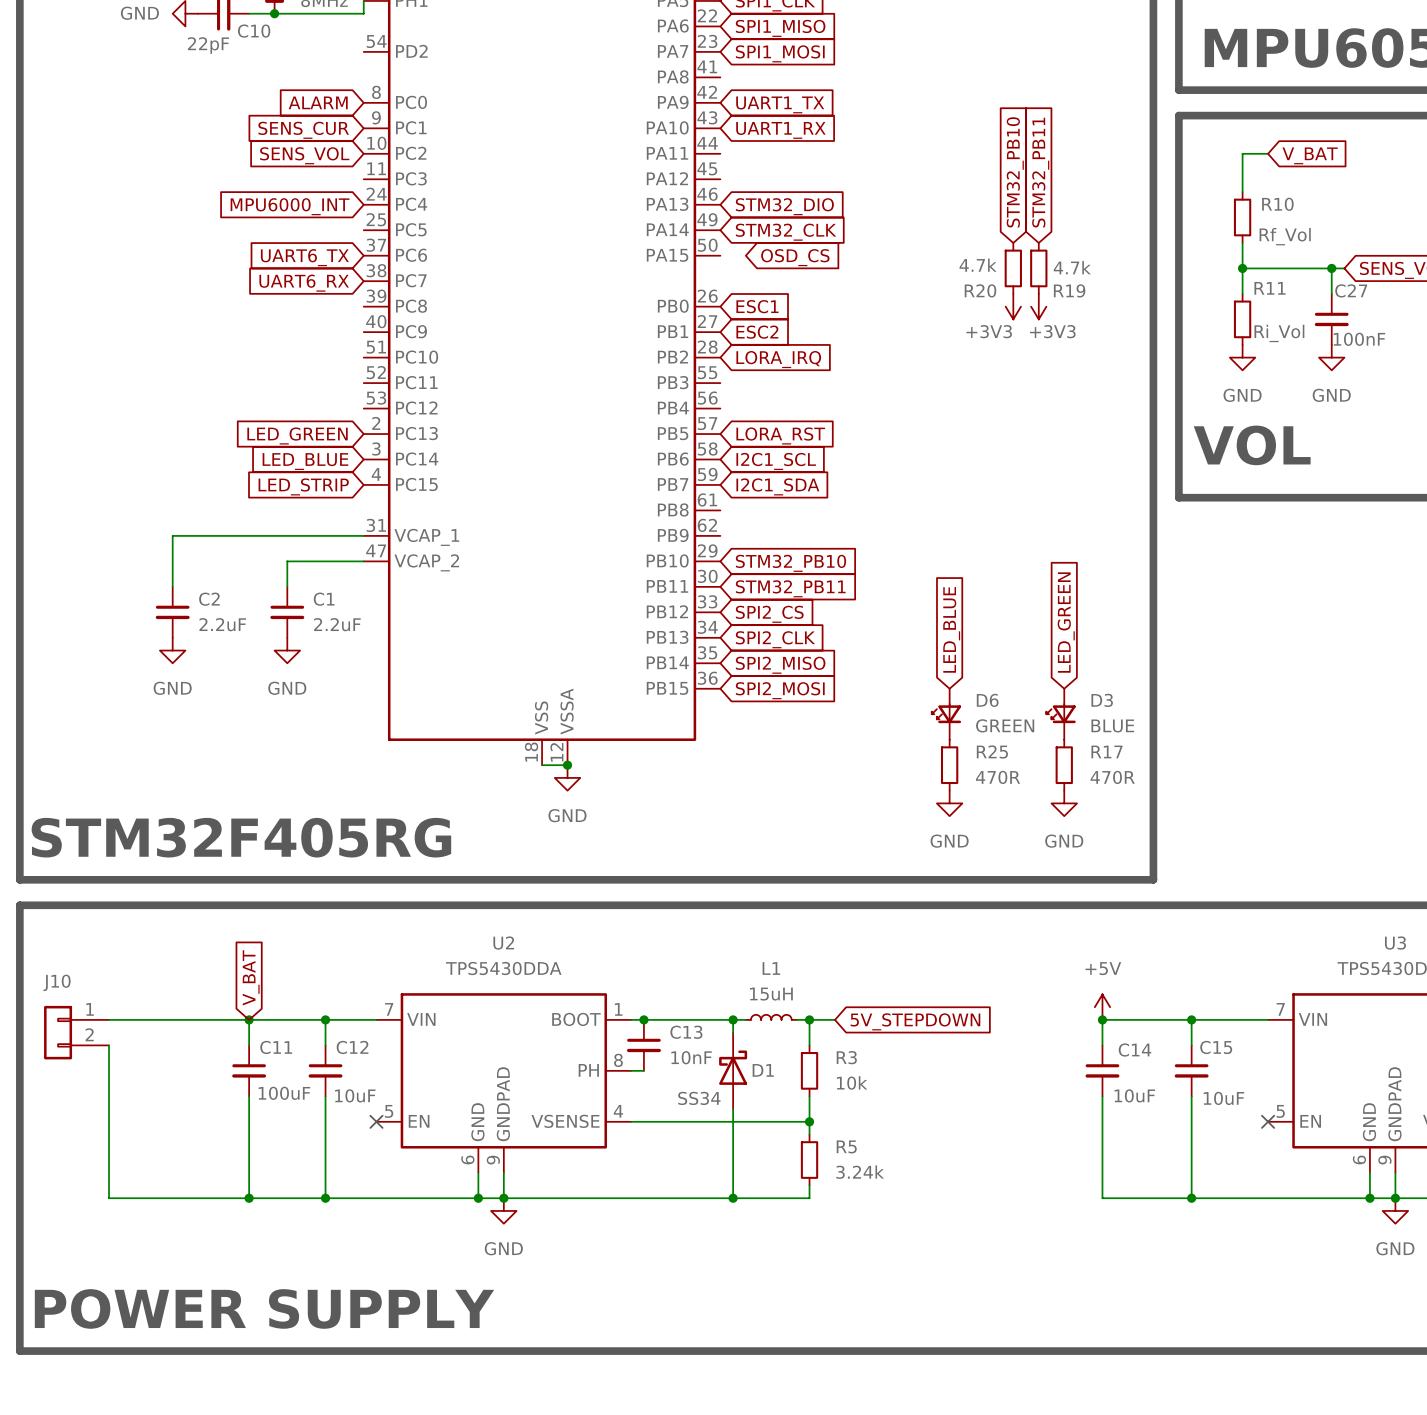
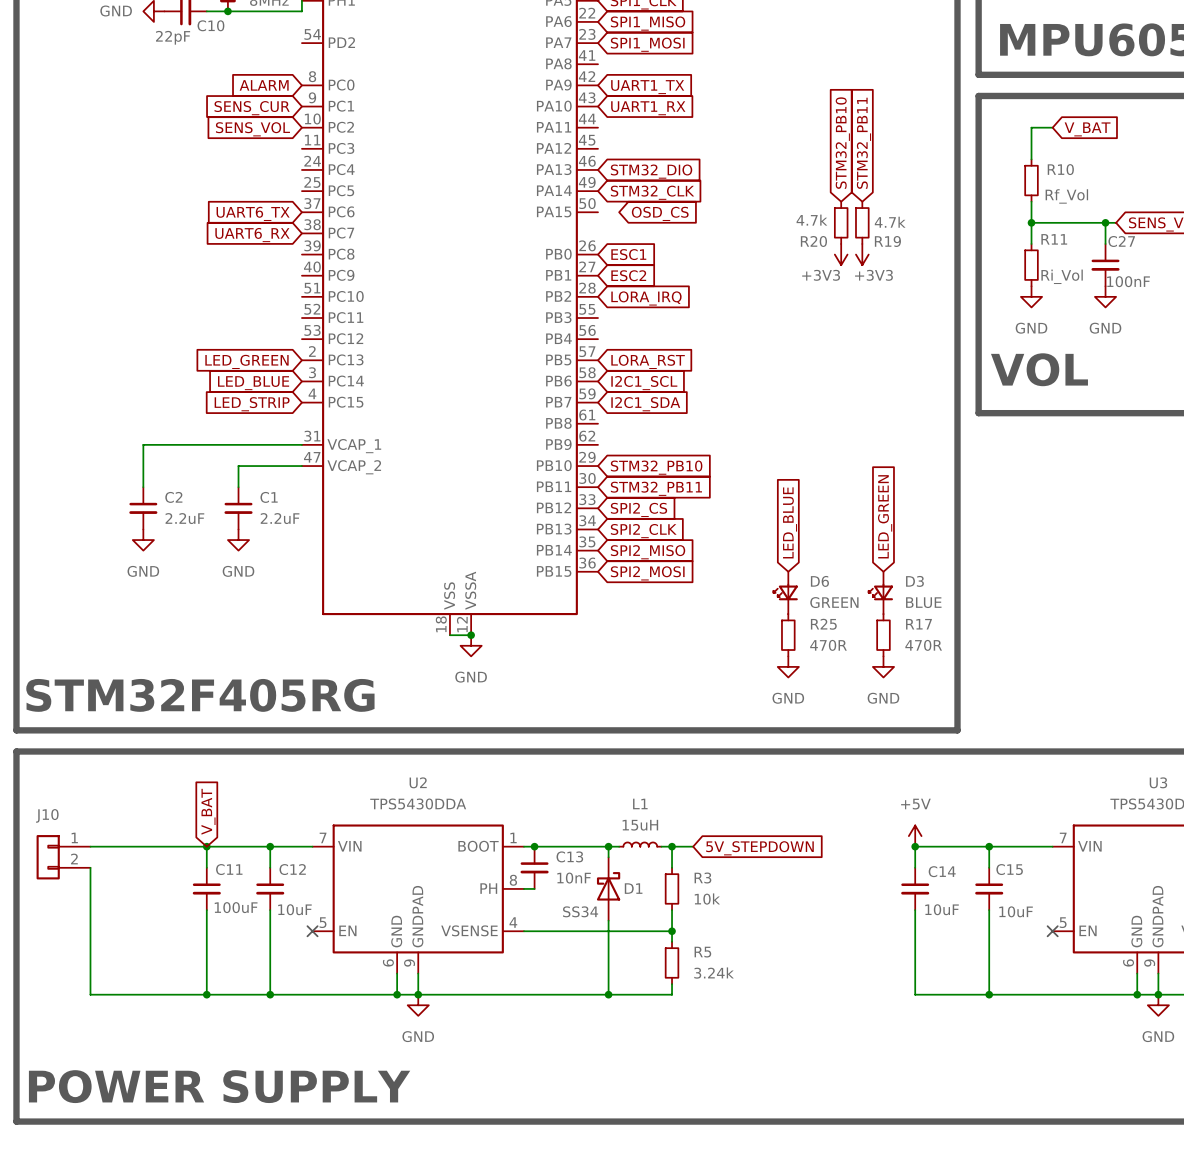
global label: MPU6000_INT (290, 206) -> none

